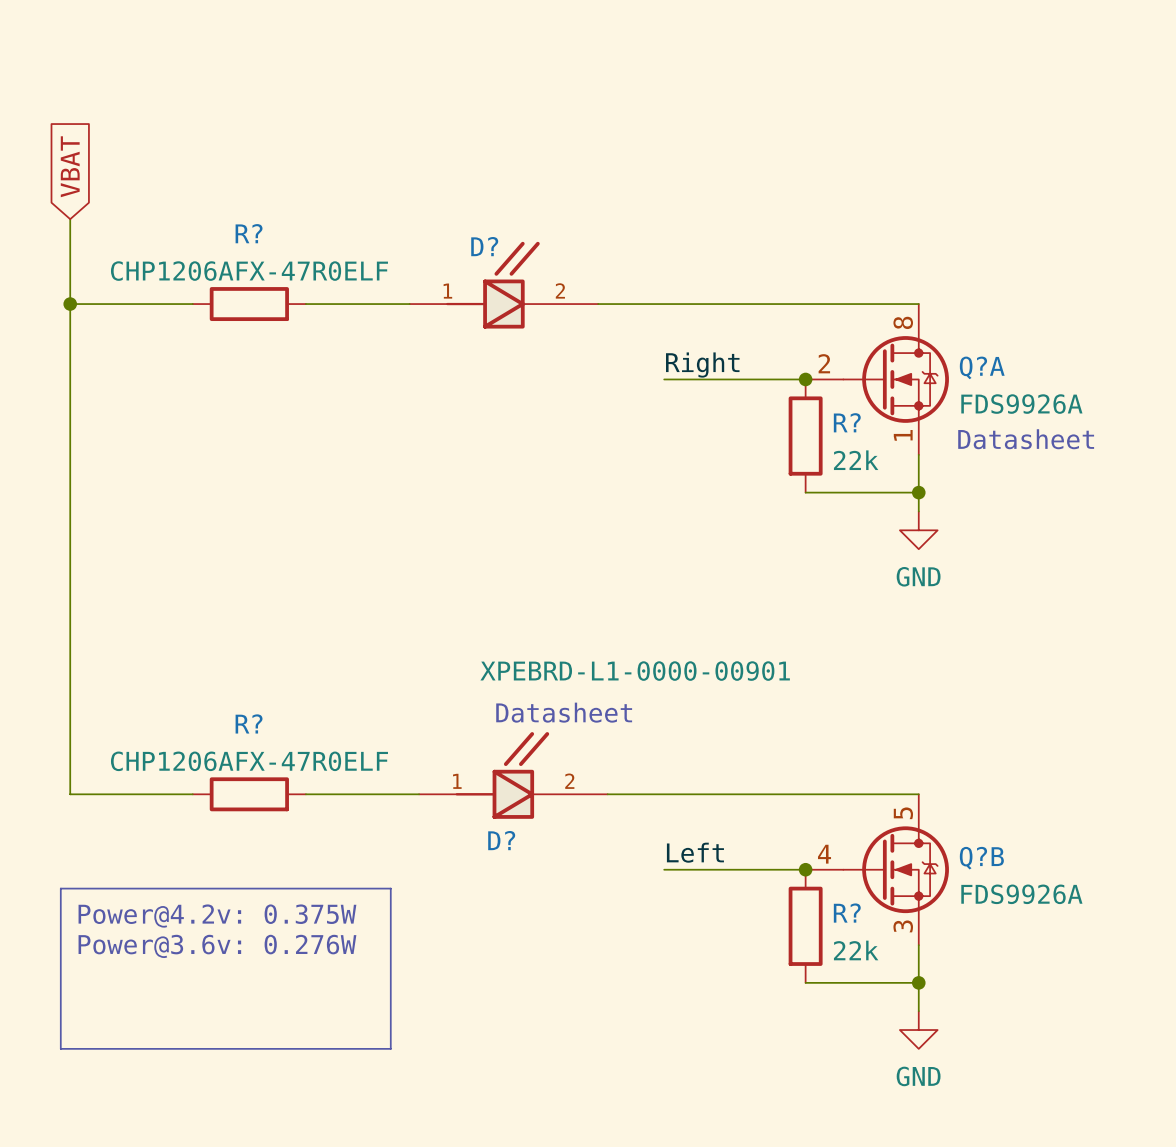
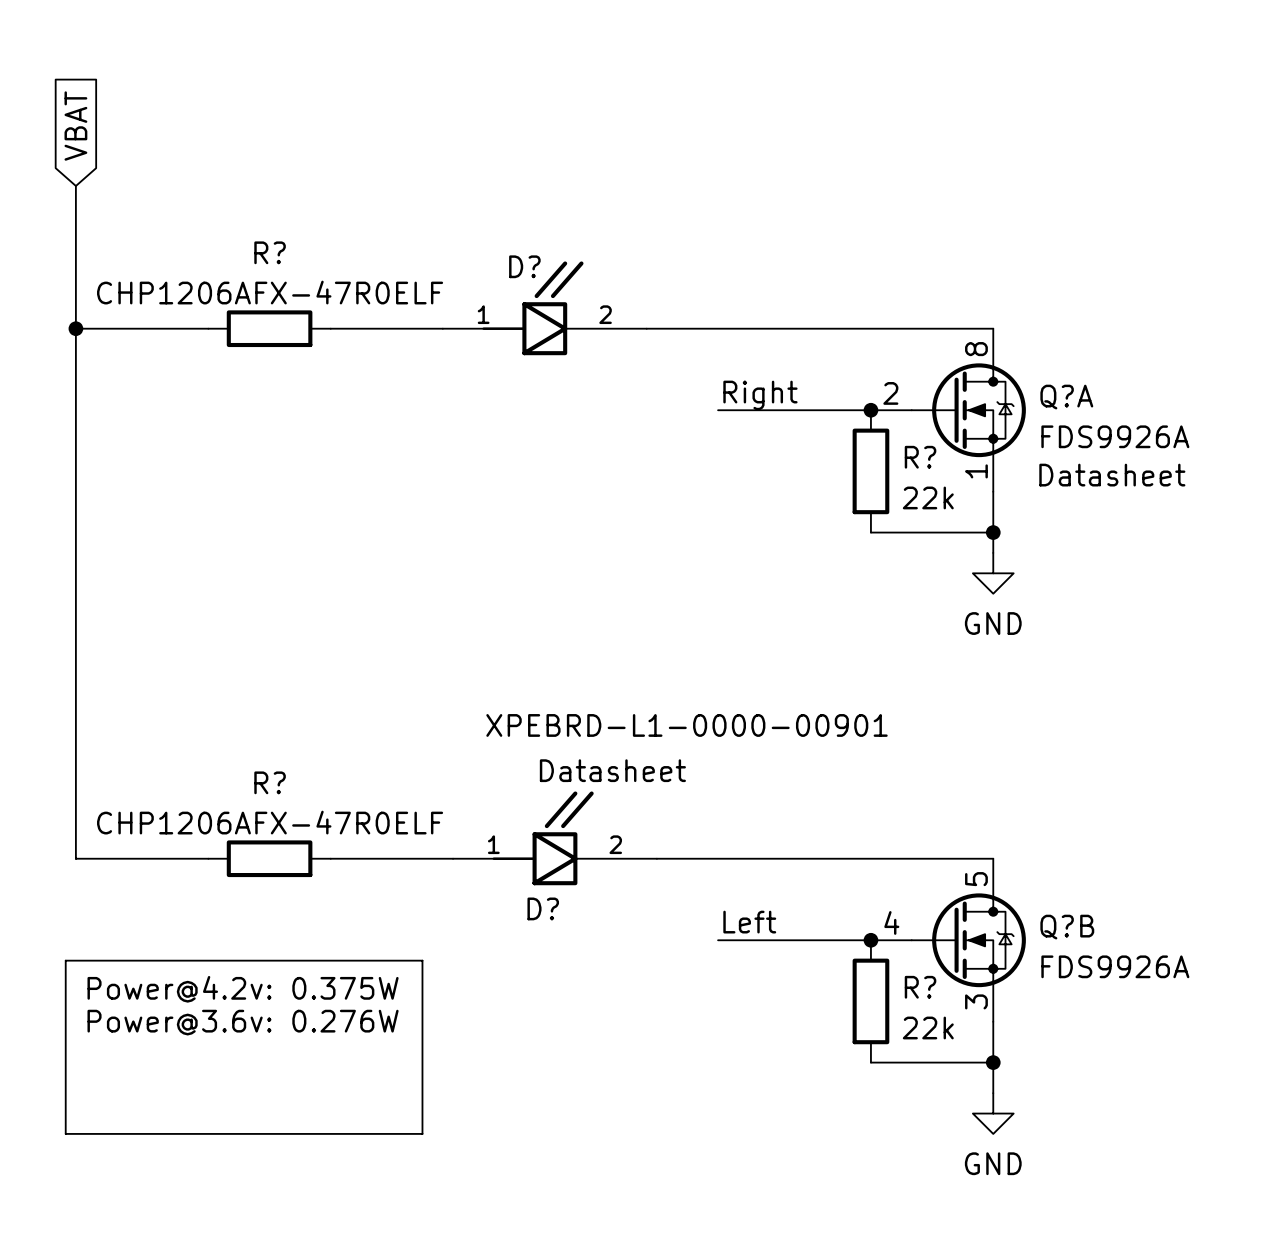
global label position: VBAT (70, 166) -> VBAT (75, 126)
wire: none -> (75, 186) (75, 236)

